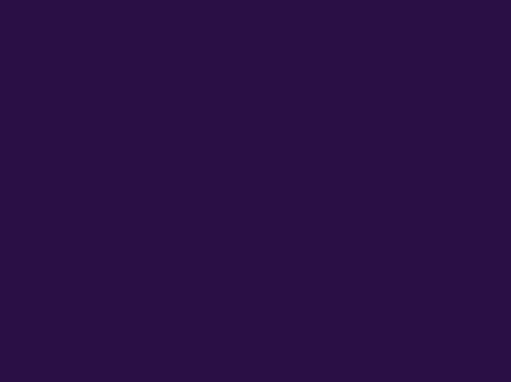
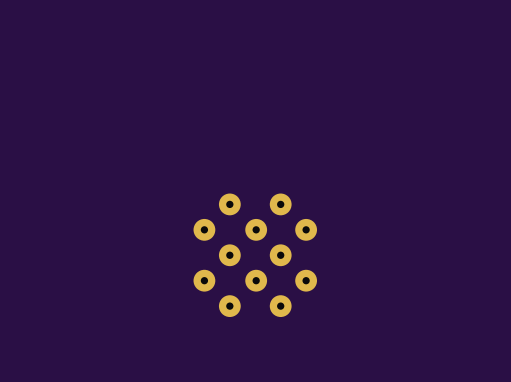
part: none -> (255, 255)

